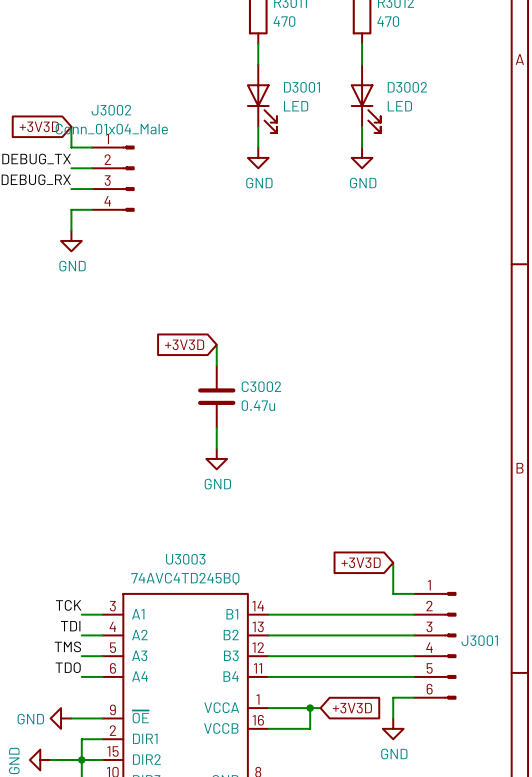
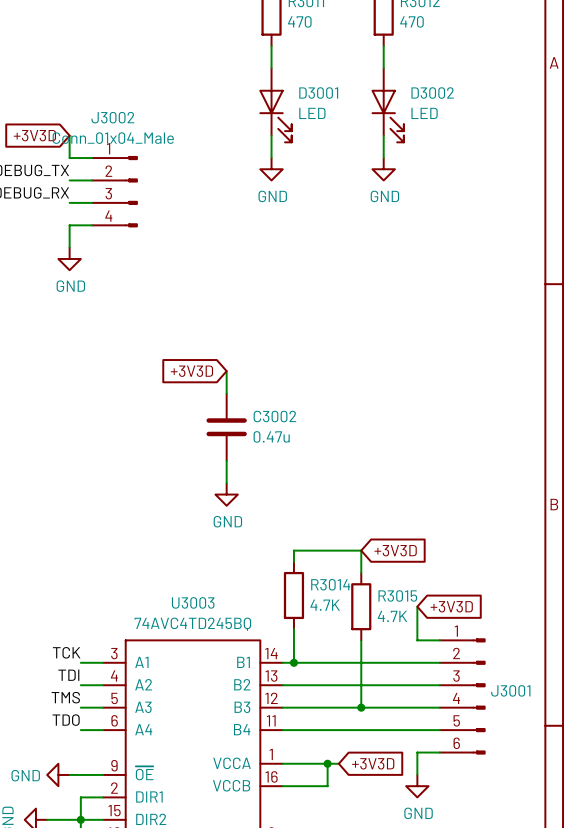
global label: none -> +3V3D (395, 550)
wire: none -> (293, 561) (293, 550) (361, 550) (361, 573)
R3014: none -> 4.7K (293, 595)
R3015: none -> 4.7K (361, 606)
global label rotation: 0° (361, 562) -> 180° (451, 606)
global label position: +3V3D (361, 562) -> +3V3D (451, 606)
wire: none -> (293, 629) (293, 662)
wire: none -> (361, 640) (361, 707)
junction: none -> (293, 662)
junction: none -> (361, 707)

